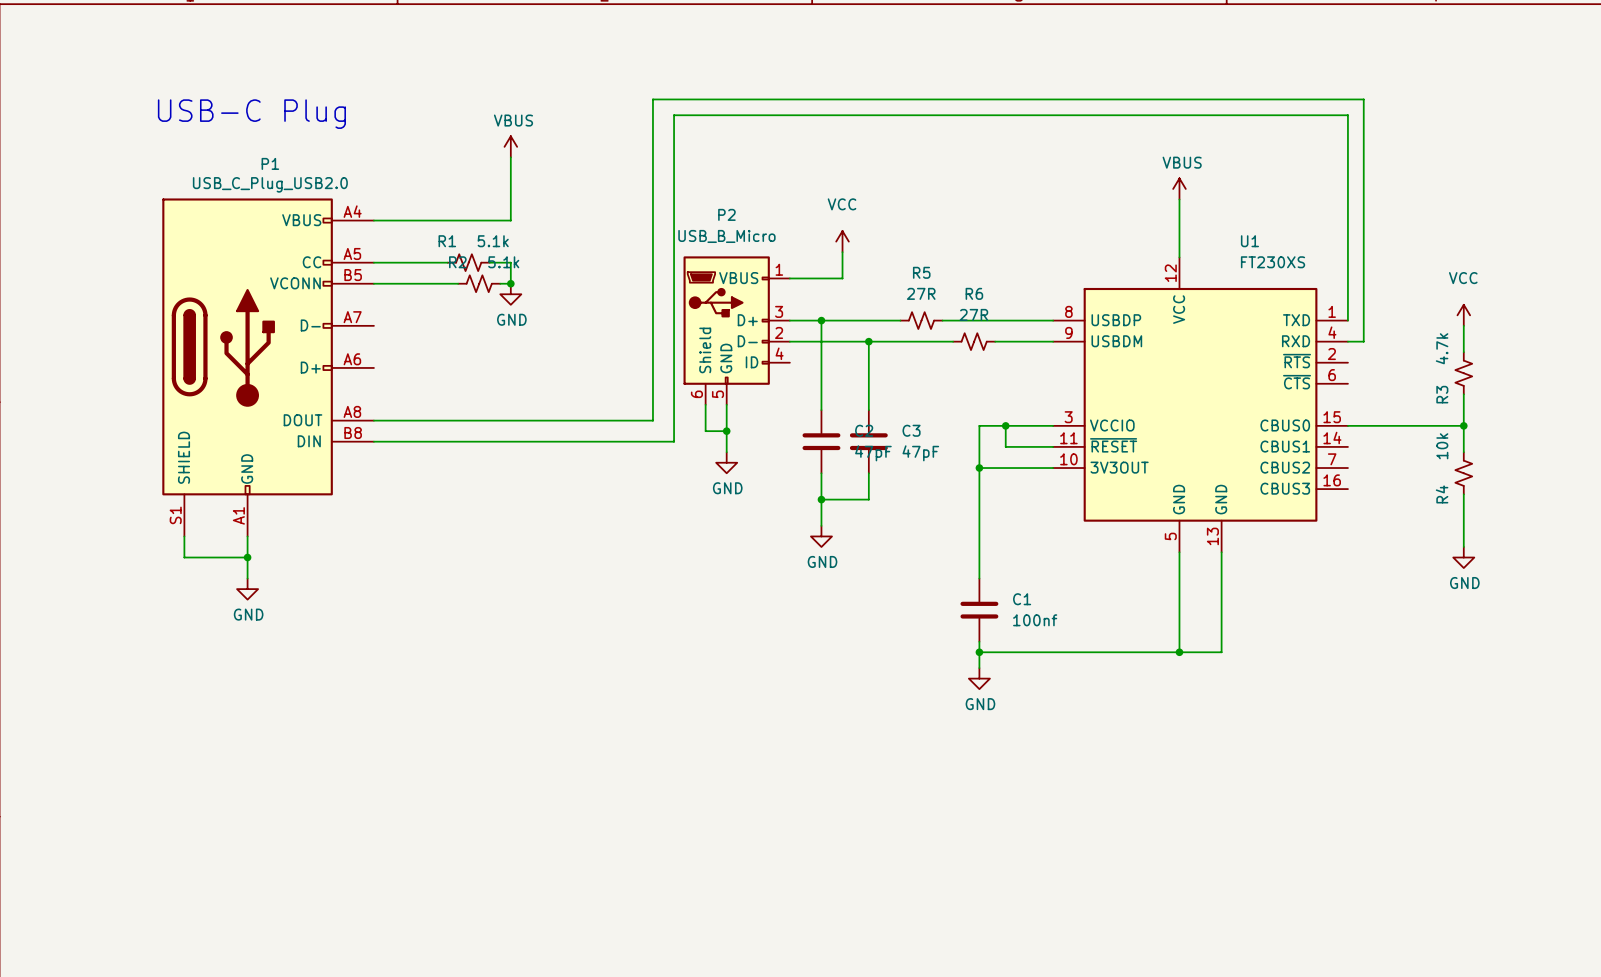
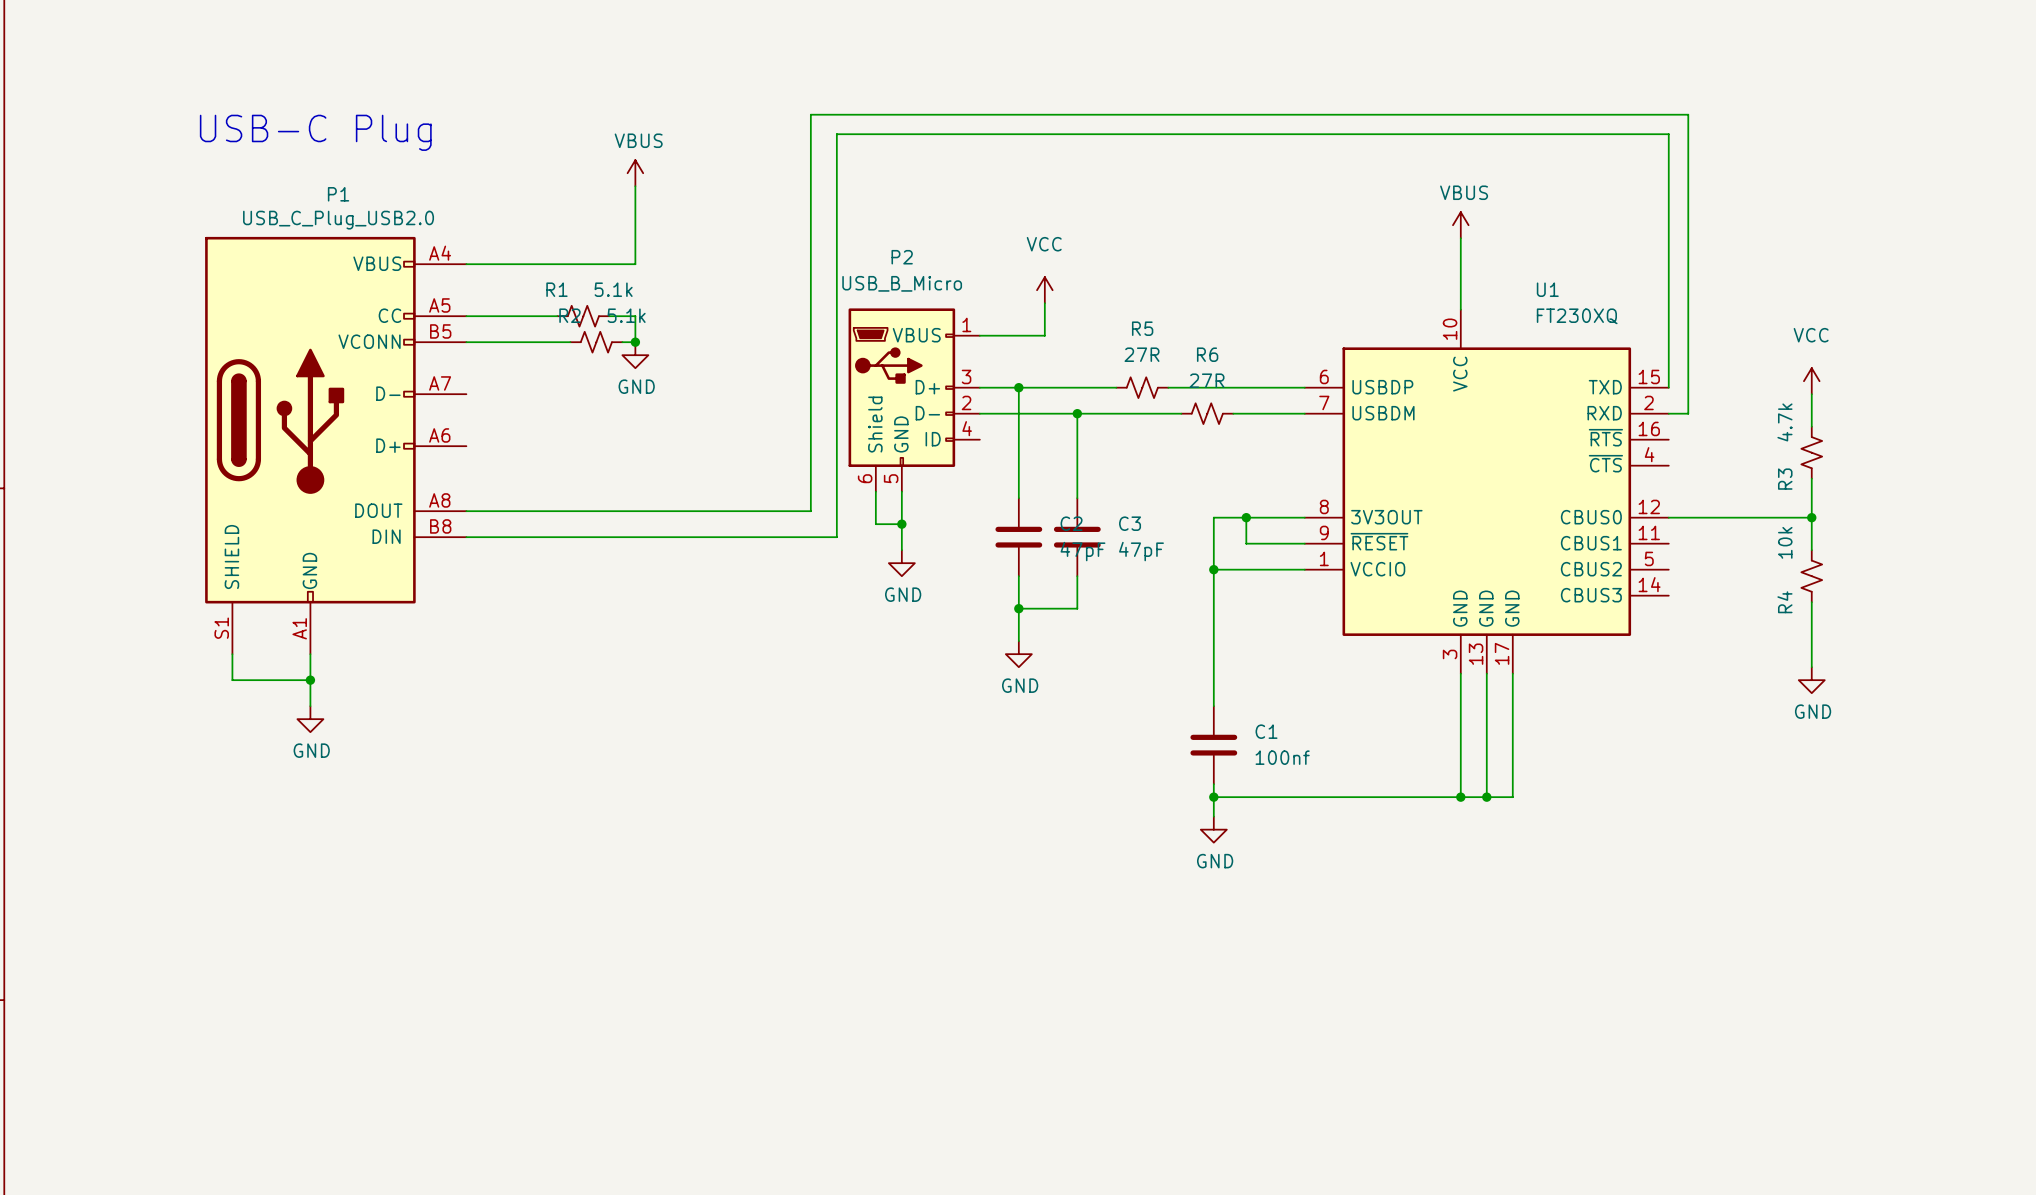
U1 symbol: [1053, 257, 1348, 553] -> [1304, 309, 1669, 674]
U1 value: FT230XS (1273, 262) -> FT230XQ (1577, 316)
wire: none -> (1486, 673) (1486, 797)
junction: none -> (1486, 797)

